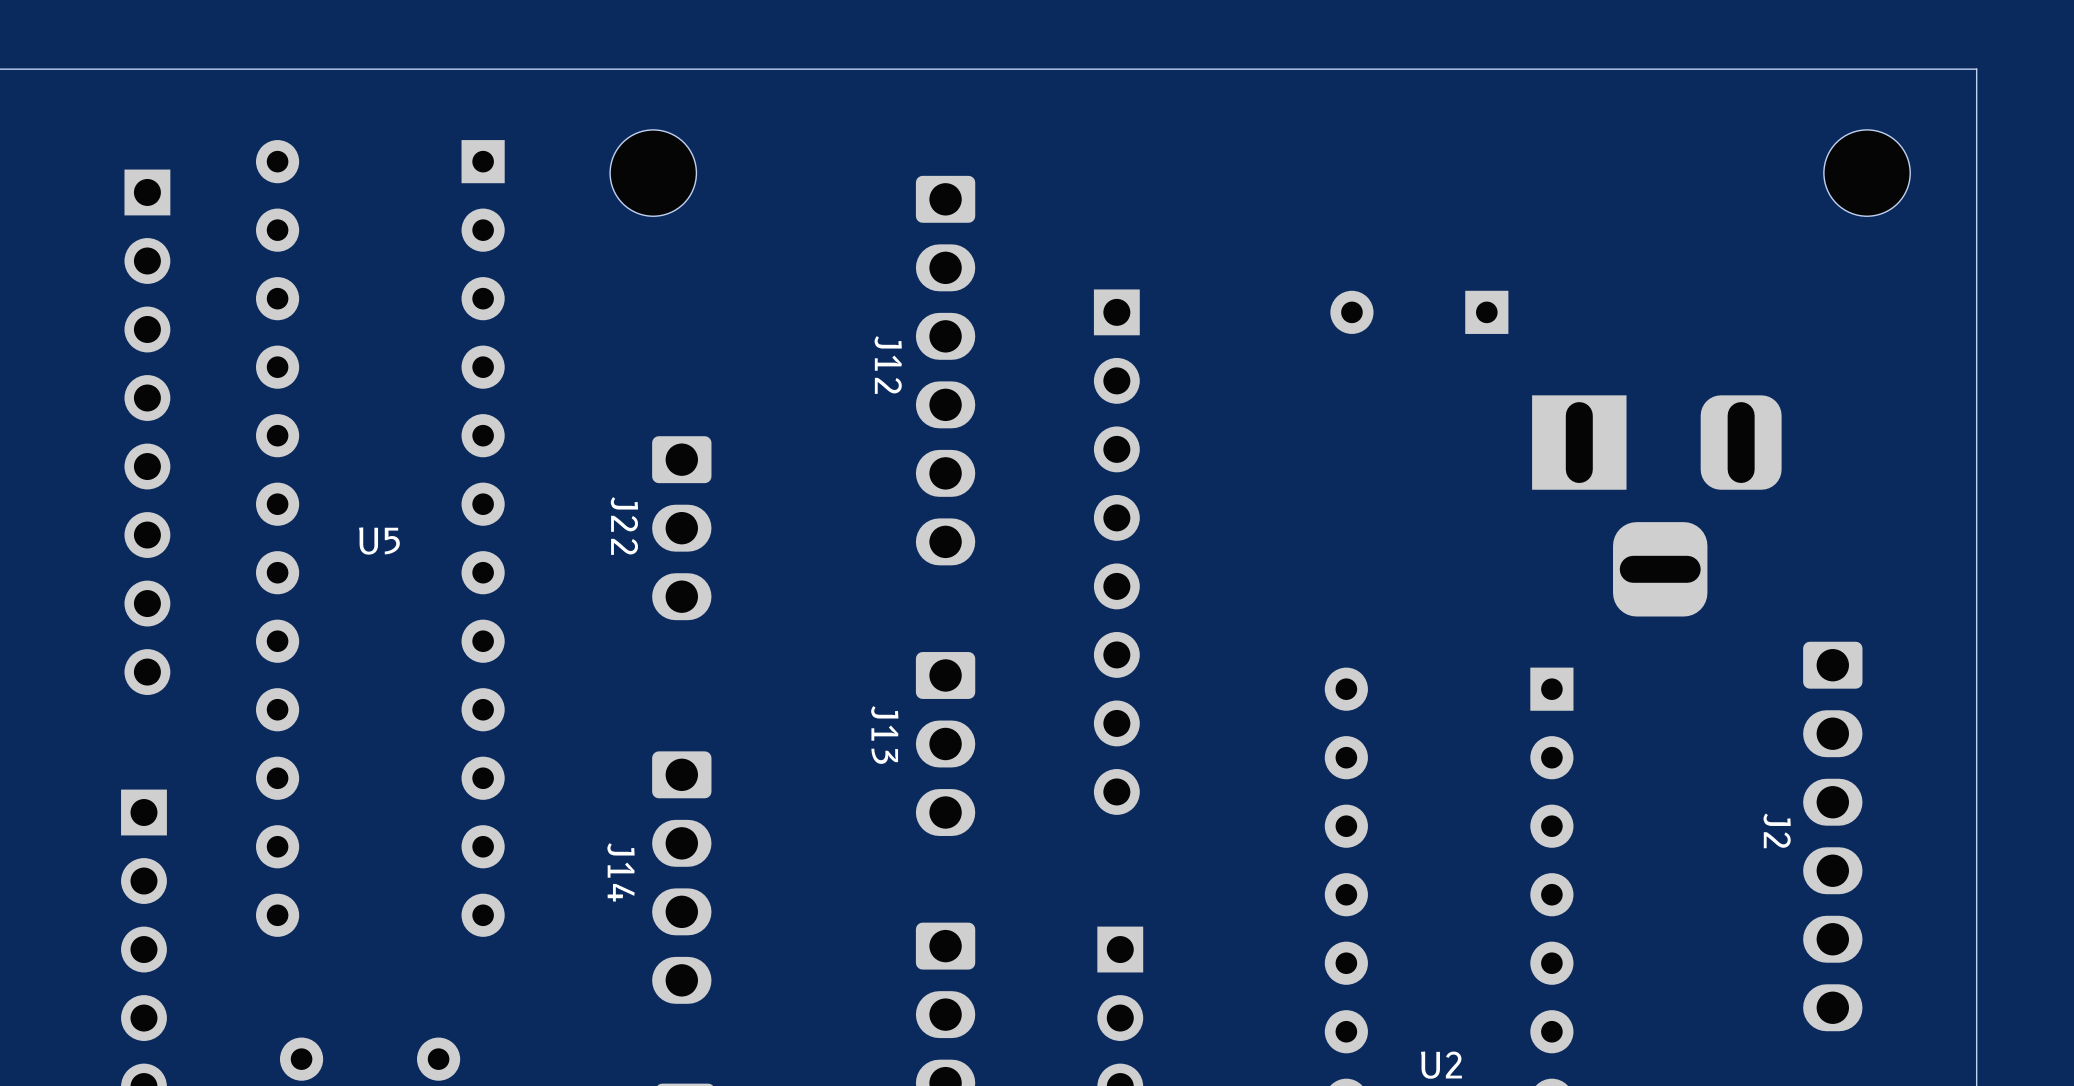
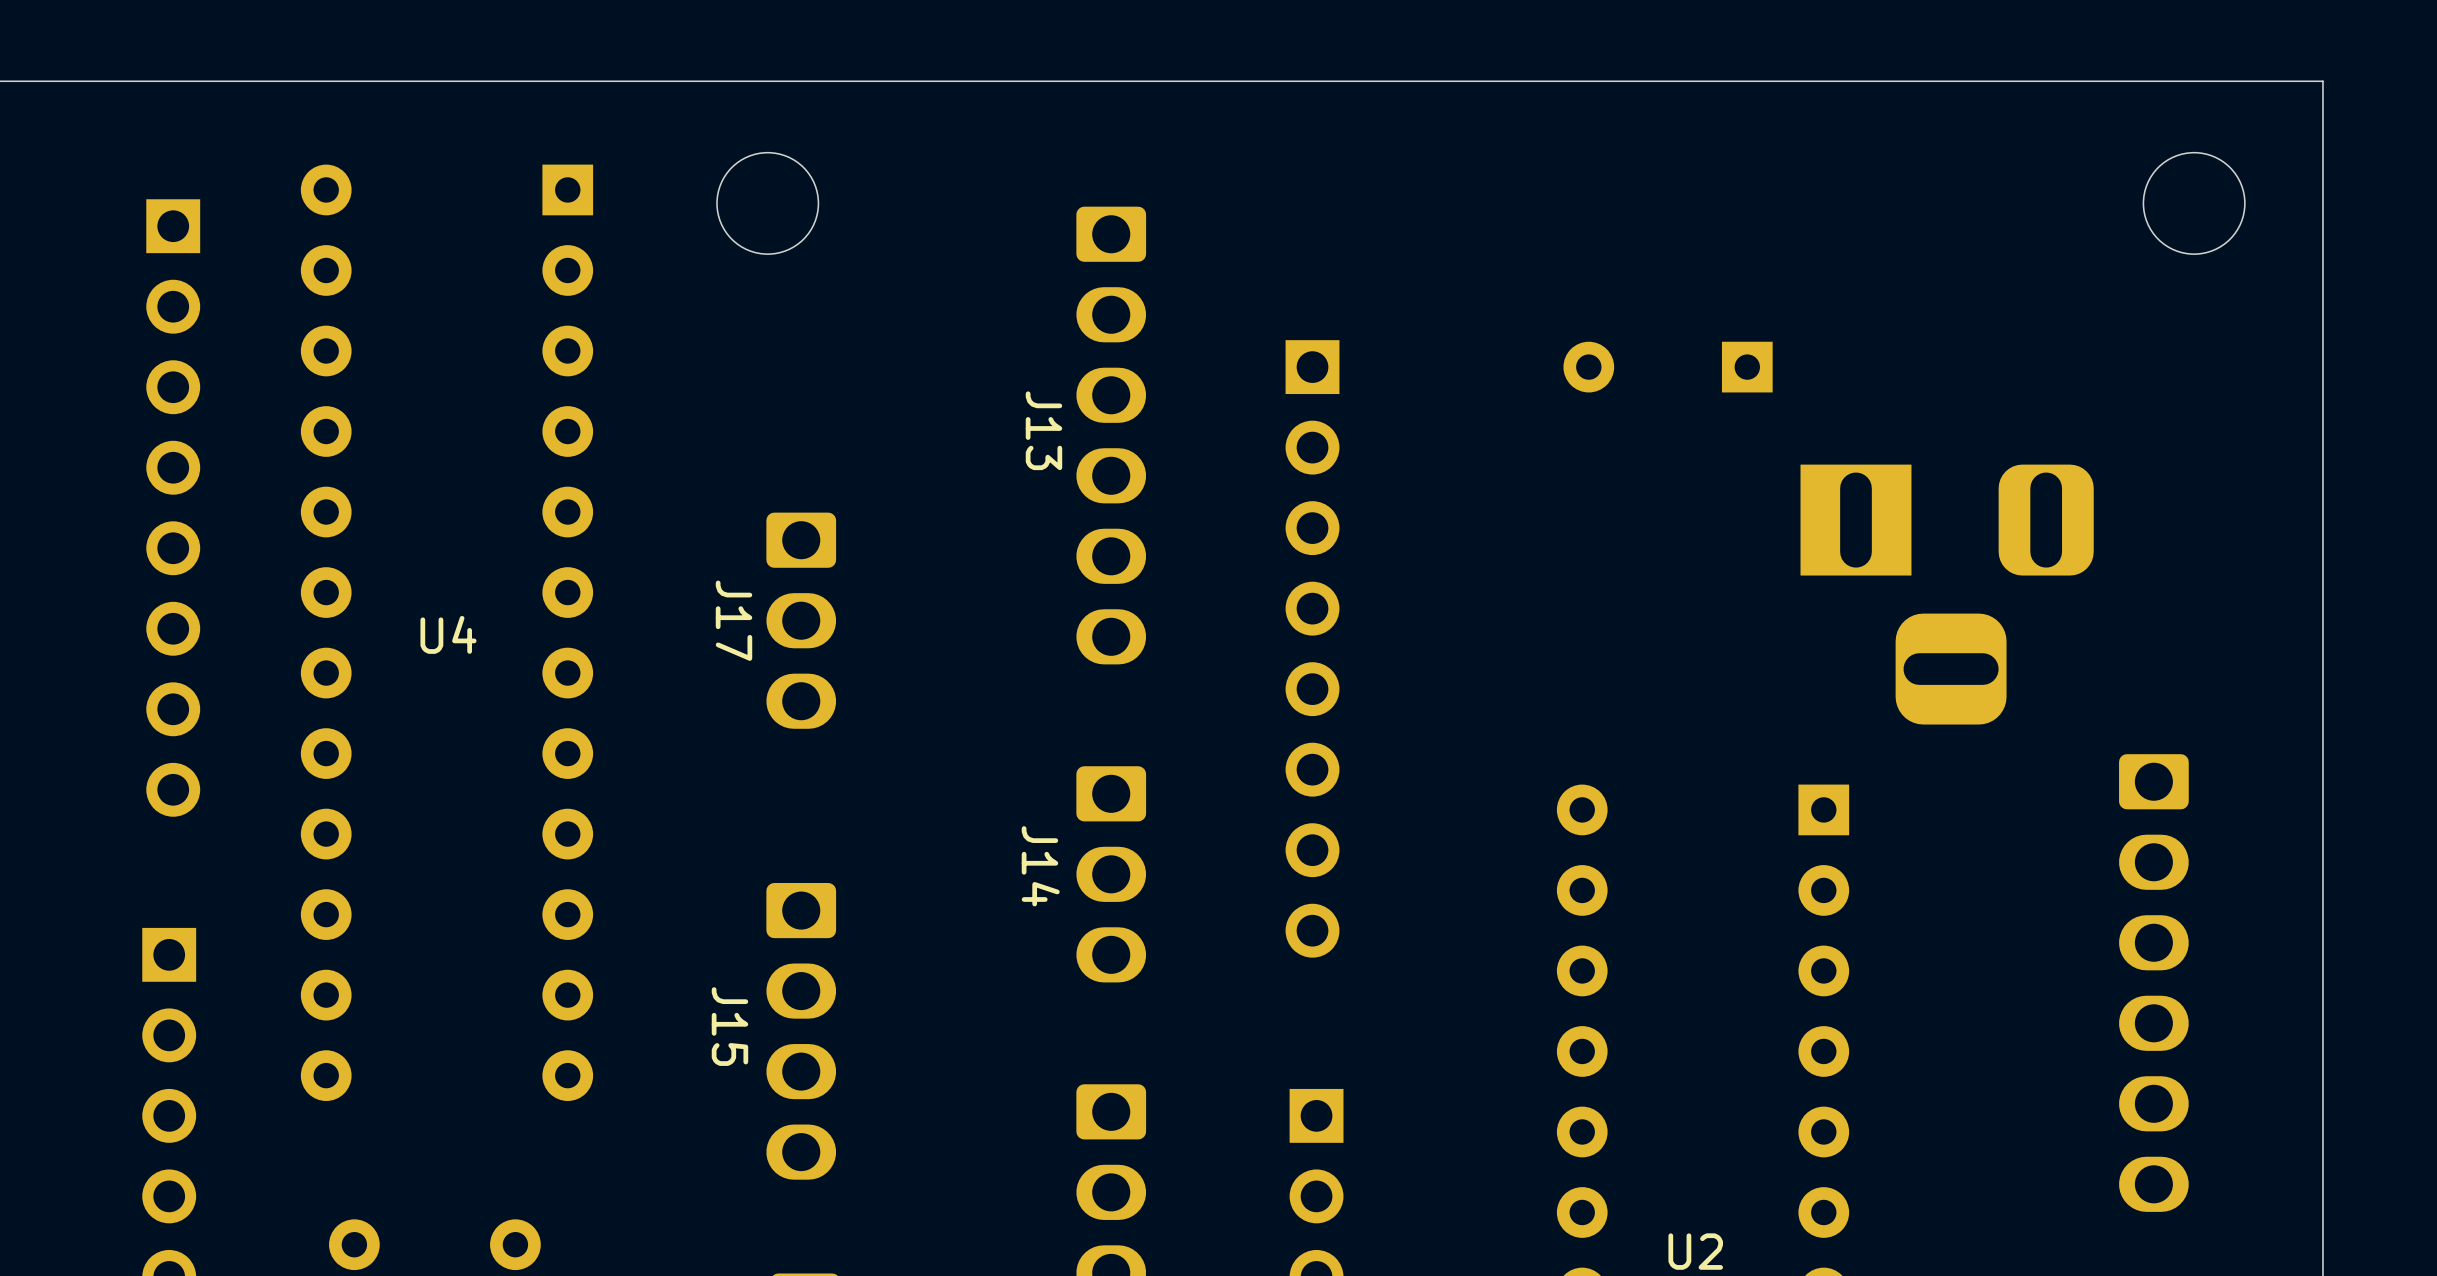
J12 name: J12 (888, 365) -> J13 (1043, 430)
J22 name: J22 (624, 526) -> J17 (733, 620)
U5 name: U5 (379, 541) -> U4 (448, 634)
J13 name: J13 (884, 734) -> J14 (1040, 866)
J2 name: J2 (1777, 830) -> none
J14 name: J14 (621, 872) -> J15 (729, 1026)

